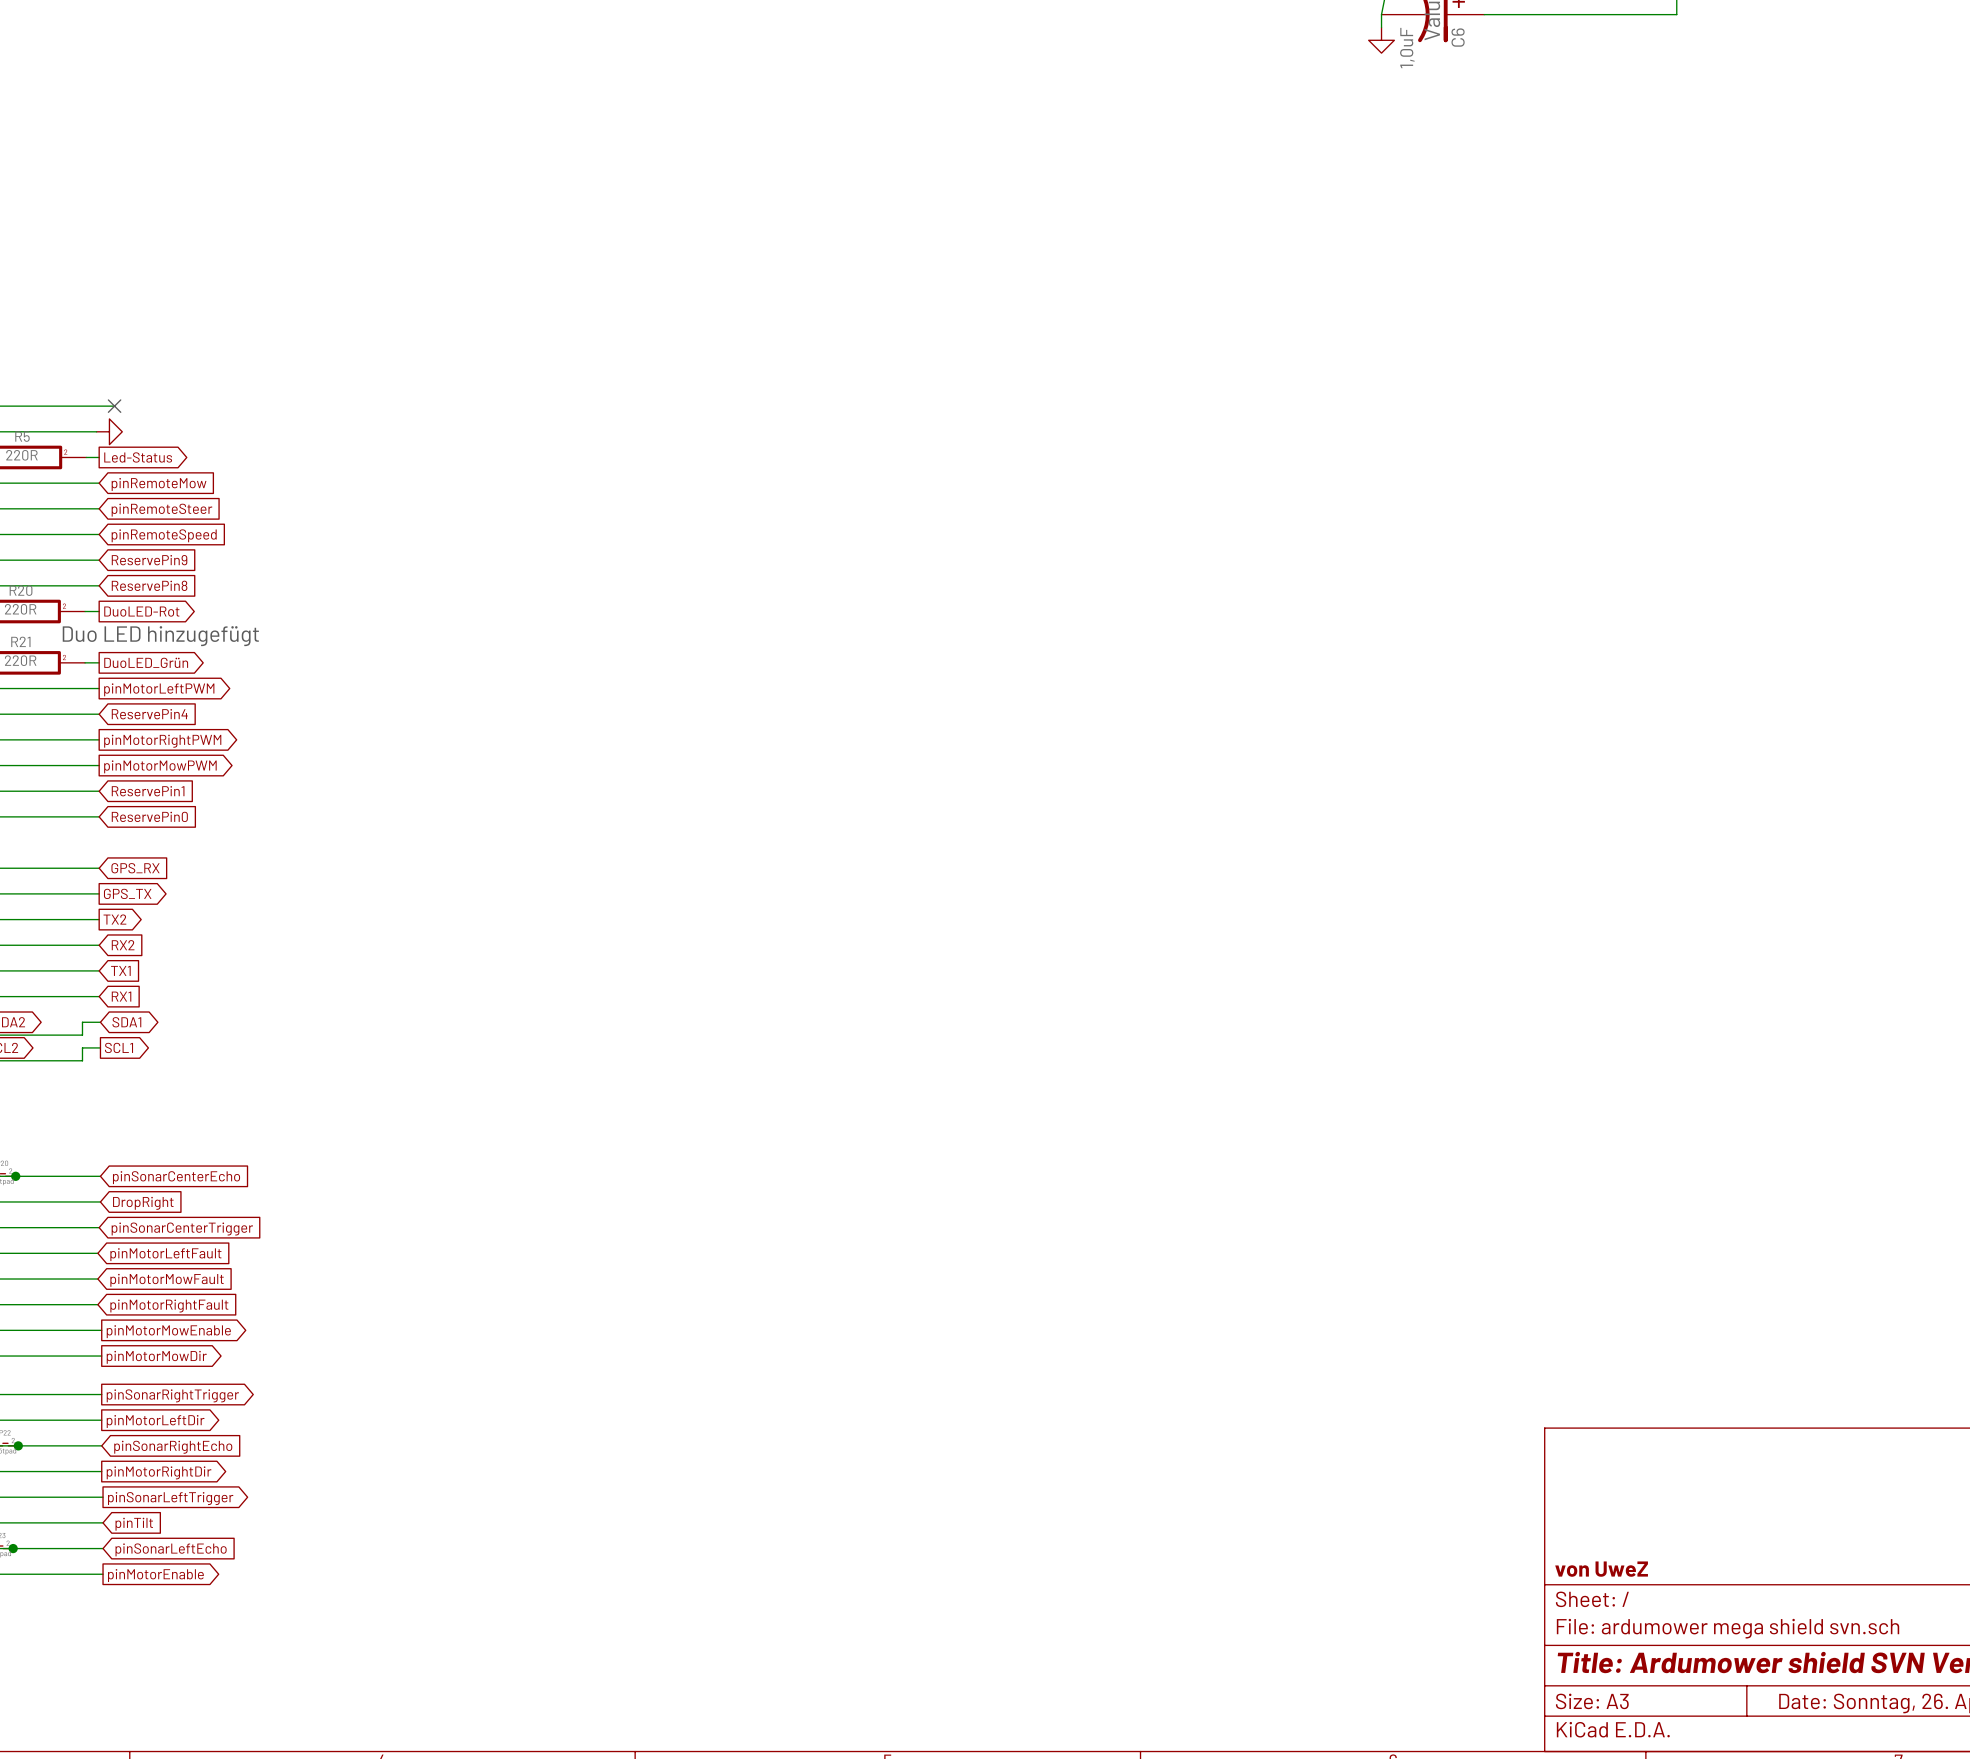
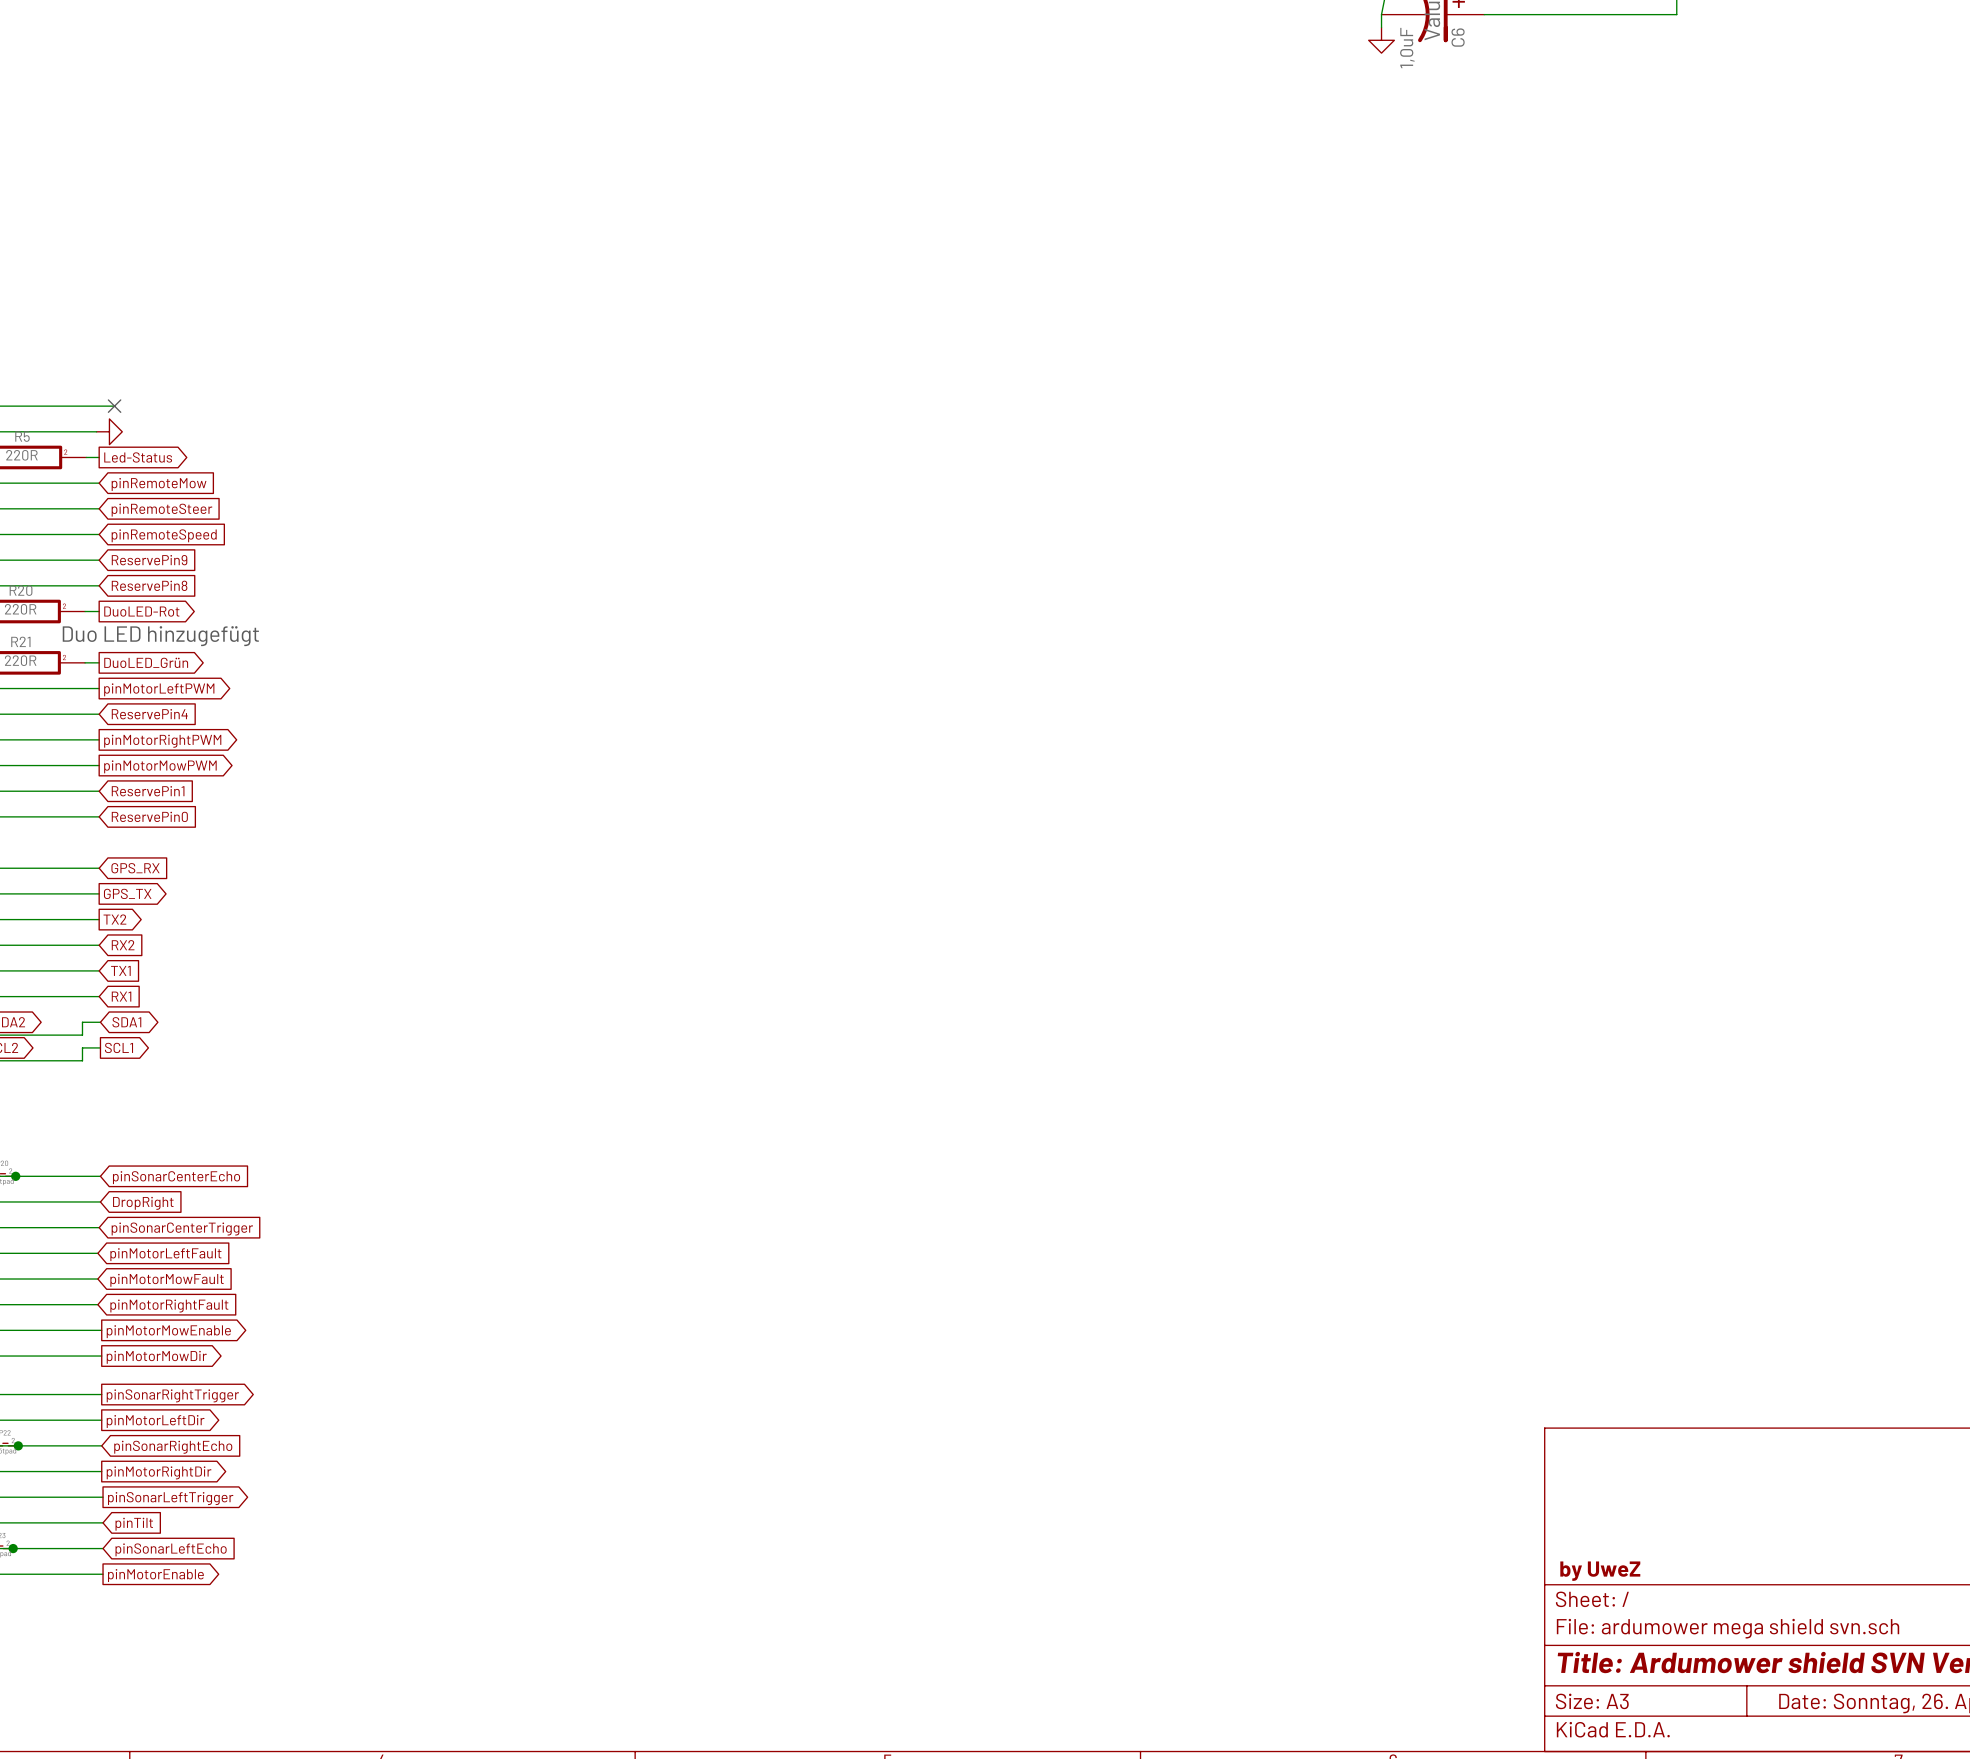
title block: von UweZ (1601, 1569) -> by UweZ (1600, 1571)

